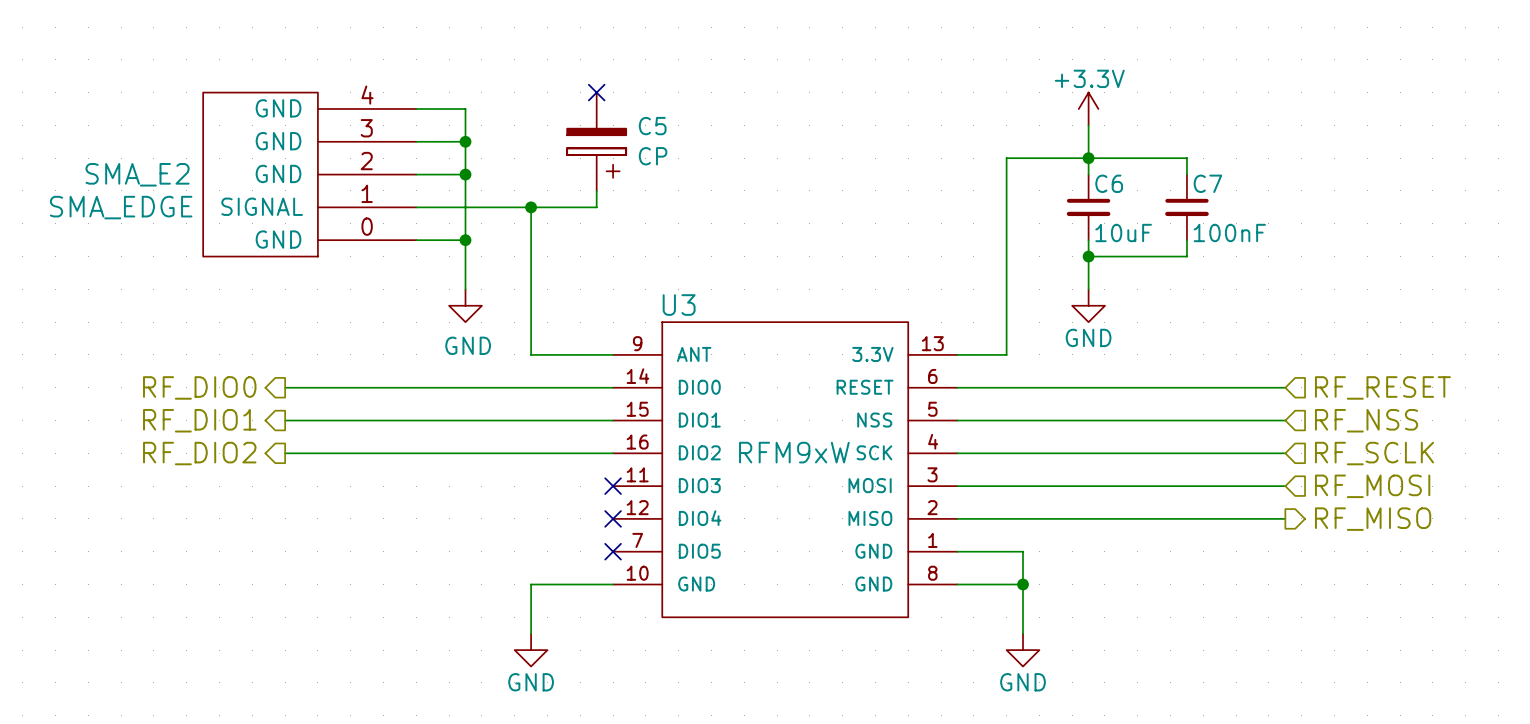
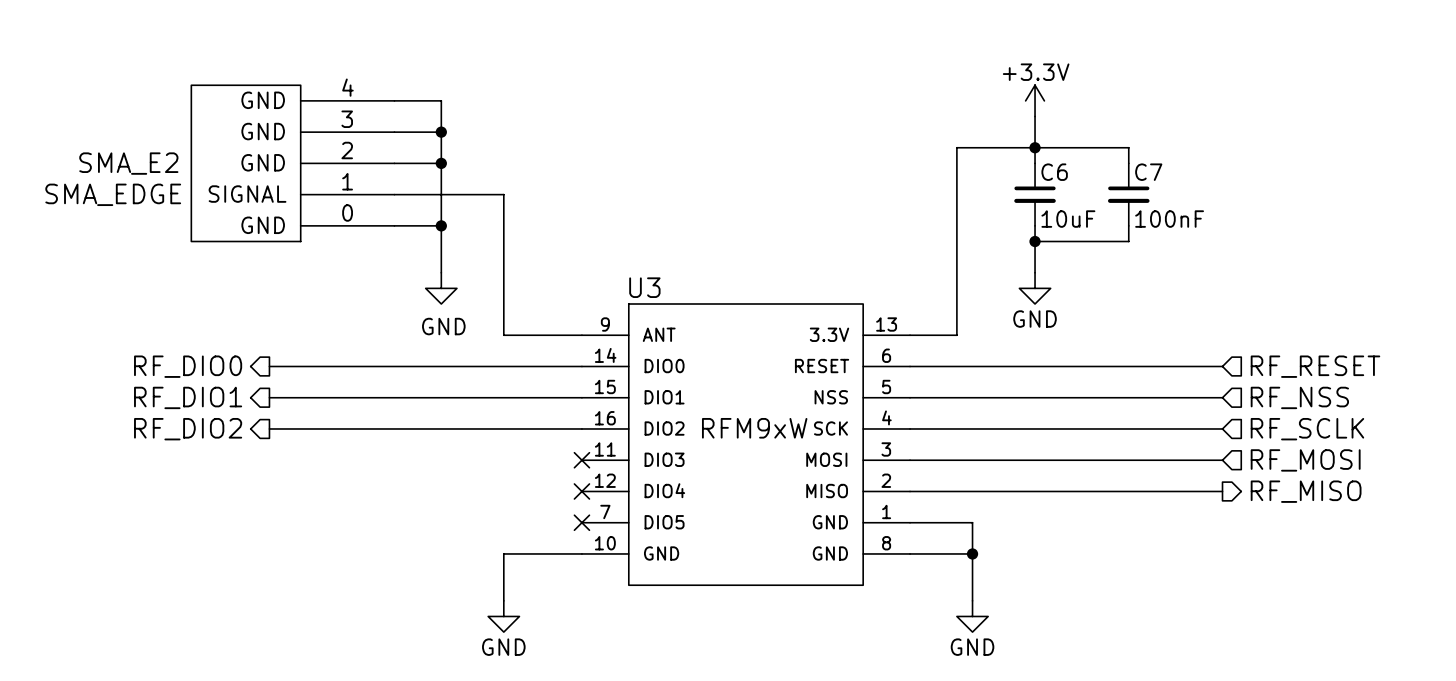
no-connect mark: (596, 92) -> none
C5: CP (596, 141) -> none
wire: (596, 190) (596, 207) (531, 207) -> none
junction: (531, 207) -> none

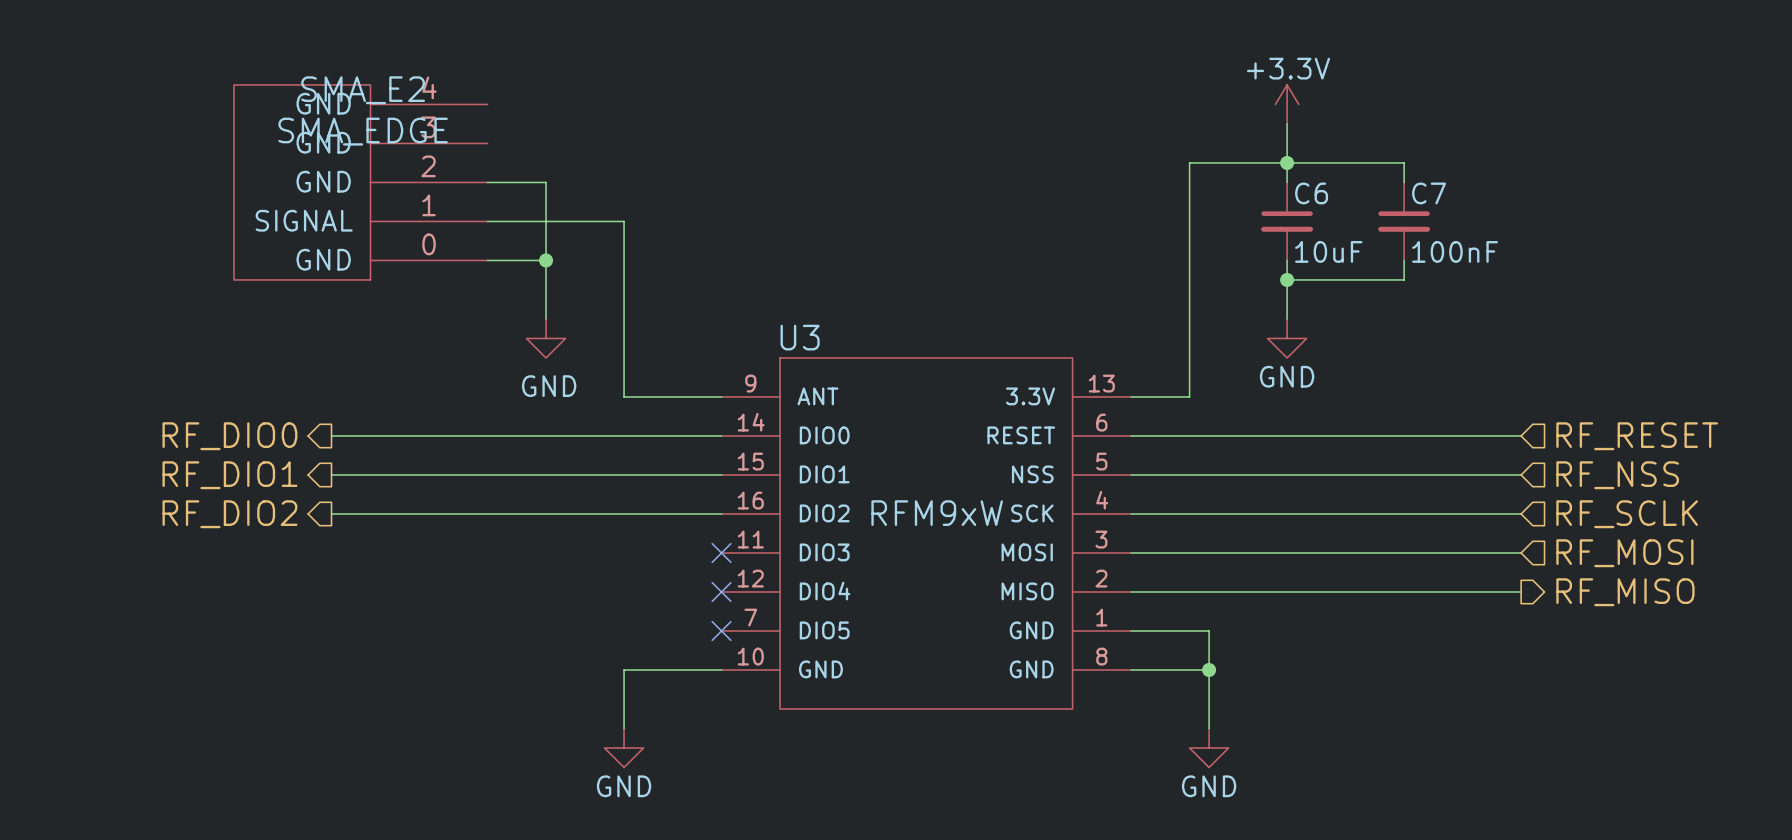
wire: (394, 100) (441, 100) (441, 163) -> none
wire: (394, 132) (441, 132) -> none
junction: (441, 132) -> none
SMA_E2 name position: SMA_E2 (128, 163) -> SMA_E2 (363, 90)
junction: (441, 163) -> none
SMA_E2 value position: SMA_EDGE (113, 194) -> SMA_EDGE (363, 131)

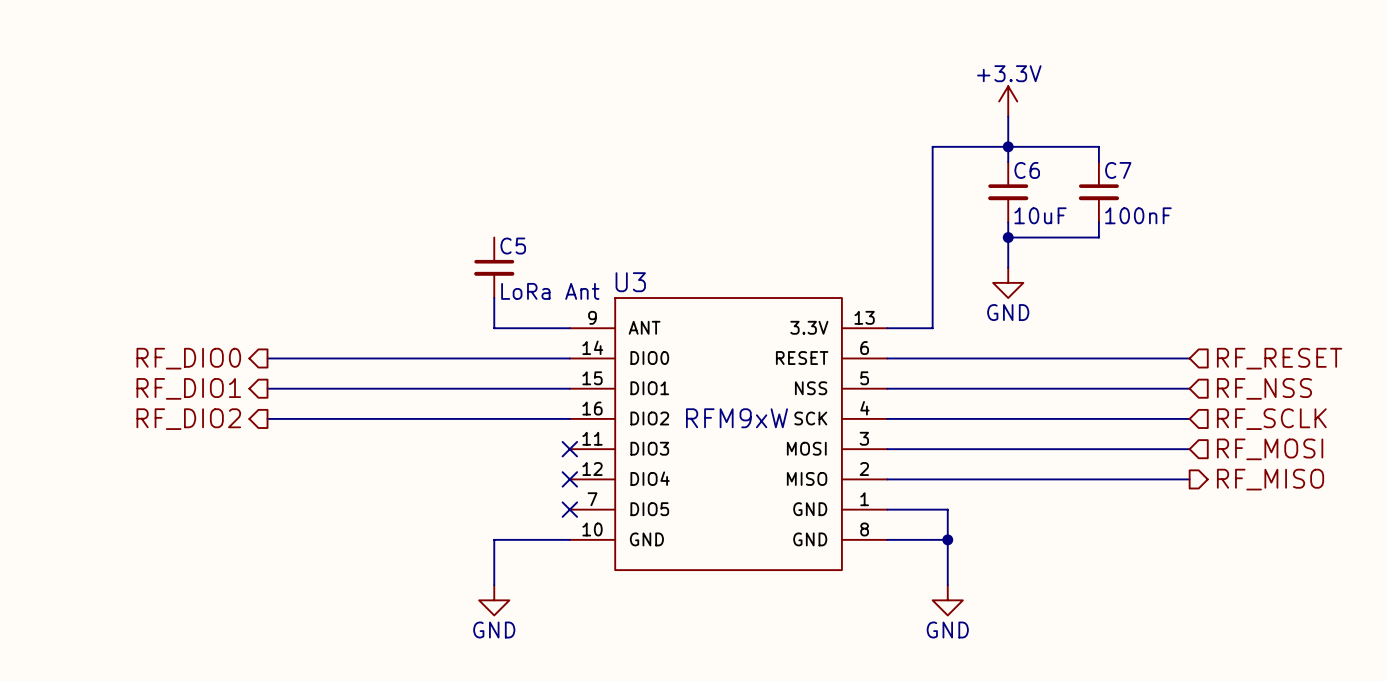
SMA_E2: SMA_EDGE (360, 182) -> none
wire: (487, 182) (546, 182) (546, 318) -> none
wire: (487, 221) (624, 221) (624, 357) -> none
wire: (487, 260) (546, 260) -> none
junction: (546, 260) -> none
C5: none -> LoRa Ant (494, 267)
power symbol: GND (546, 338) -> none

